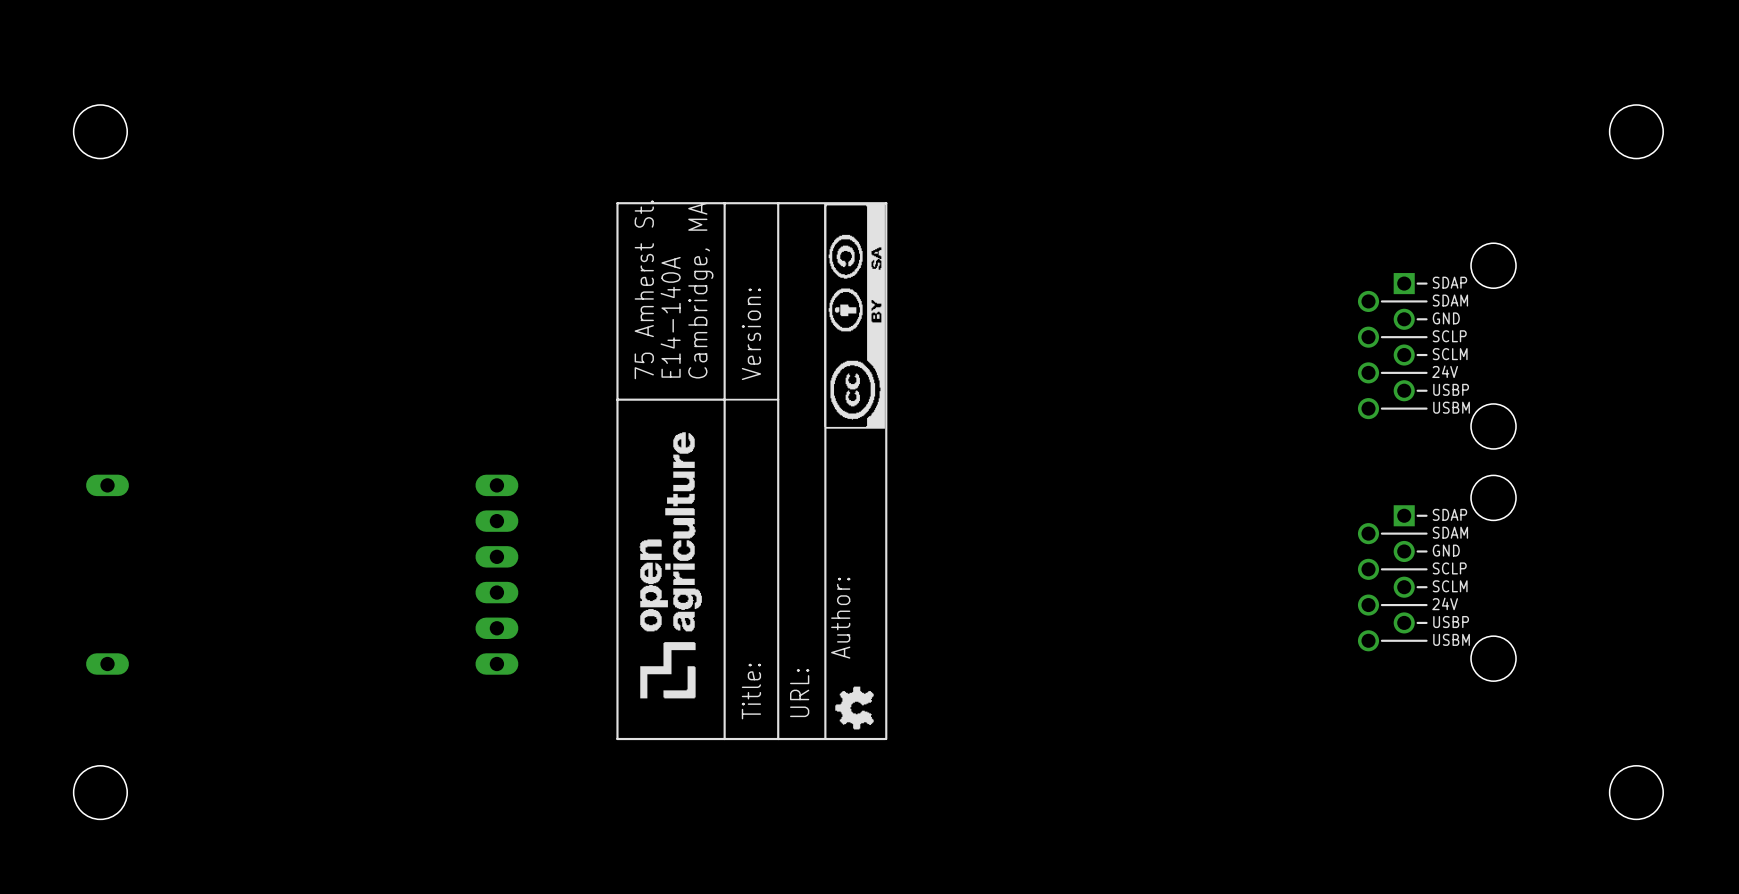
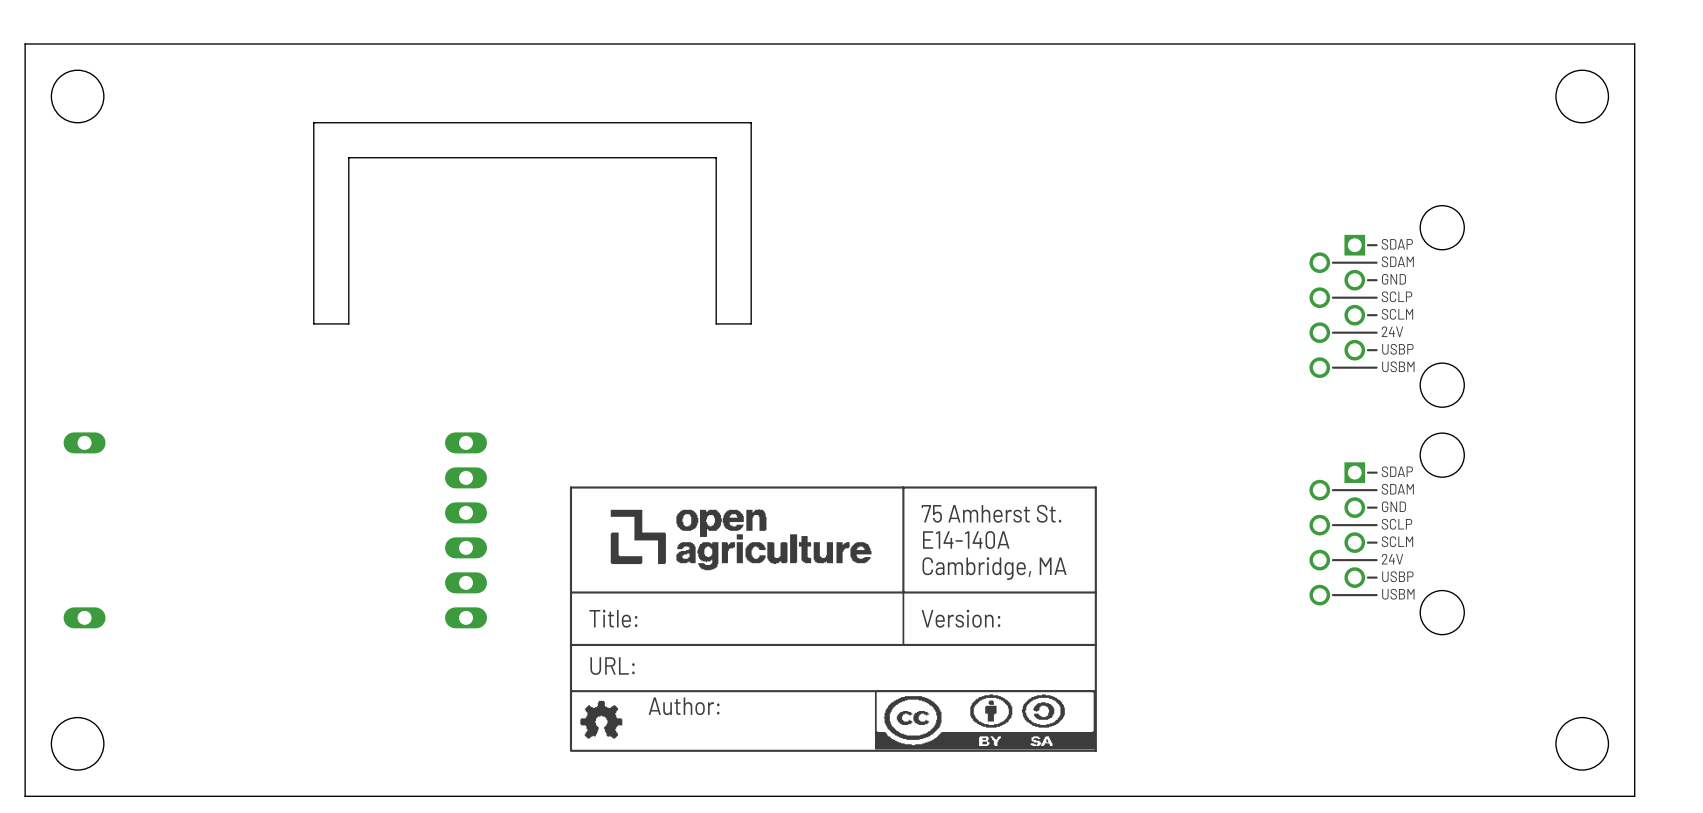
board edge: none -> (1634, 44) (25, 44) (25, 796) (1634, 796) (1634, 44)
board edge: none -> (751, 122) (313, 122) (313, 323) (348, 323) (348, 157) (716, 157) (716, 323) (751, 323) (751, 122)
drawing: [616, 202, 888, 741] -> none
drawing: none -> [569, 486, 1097, 752]

